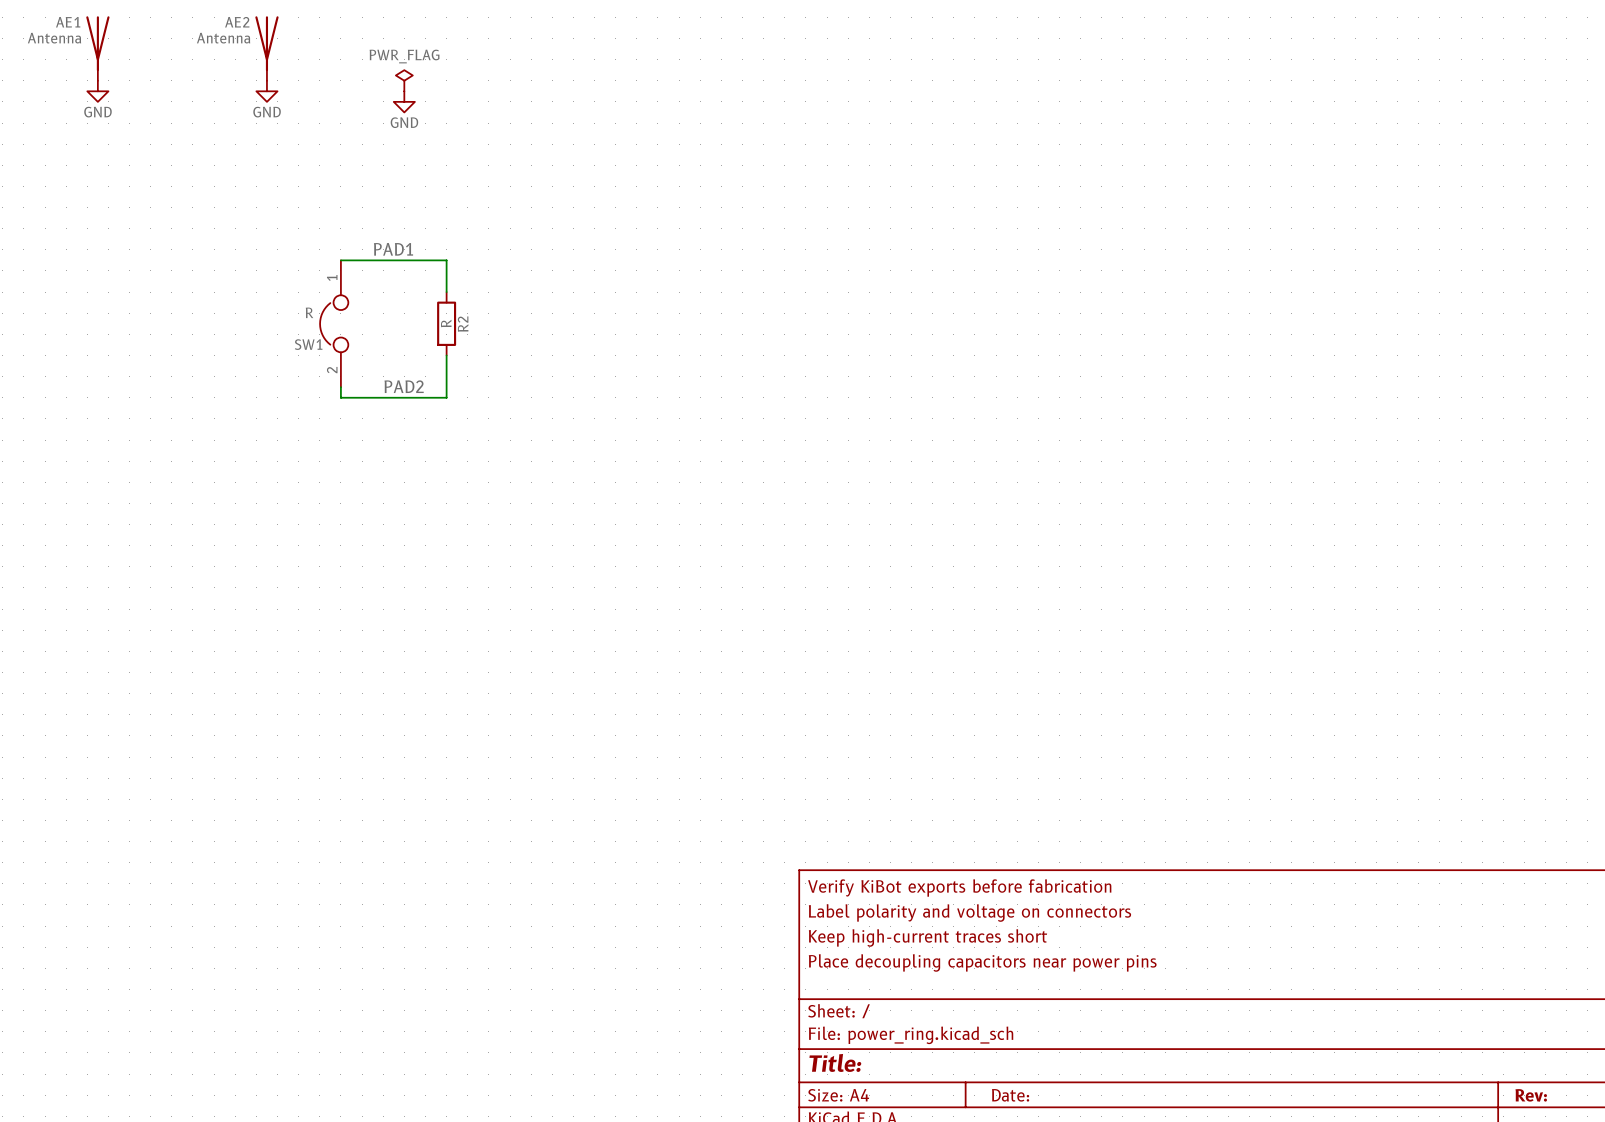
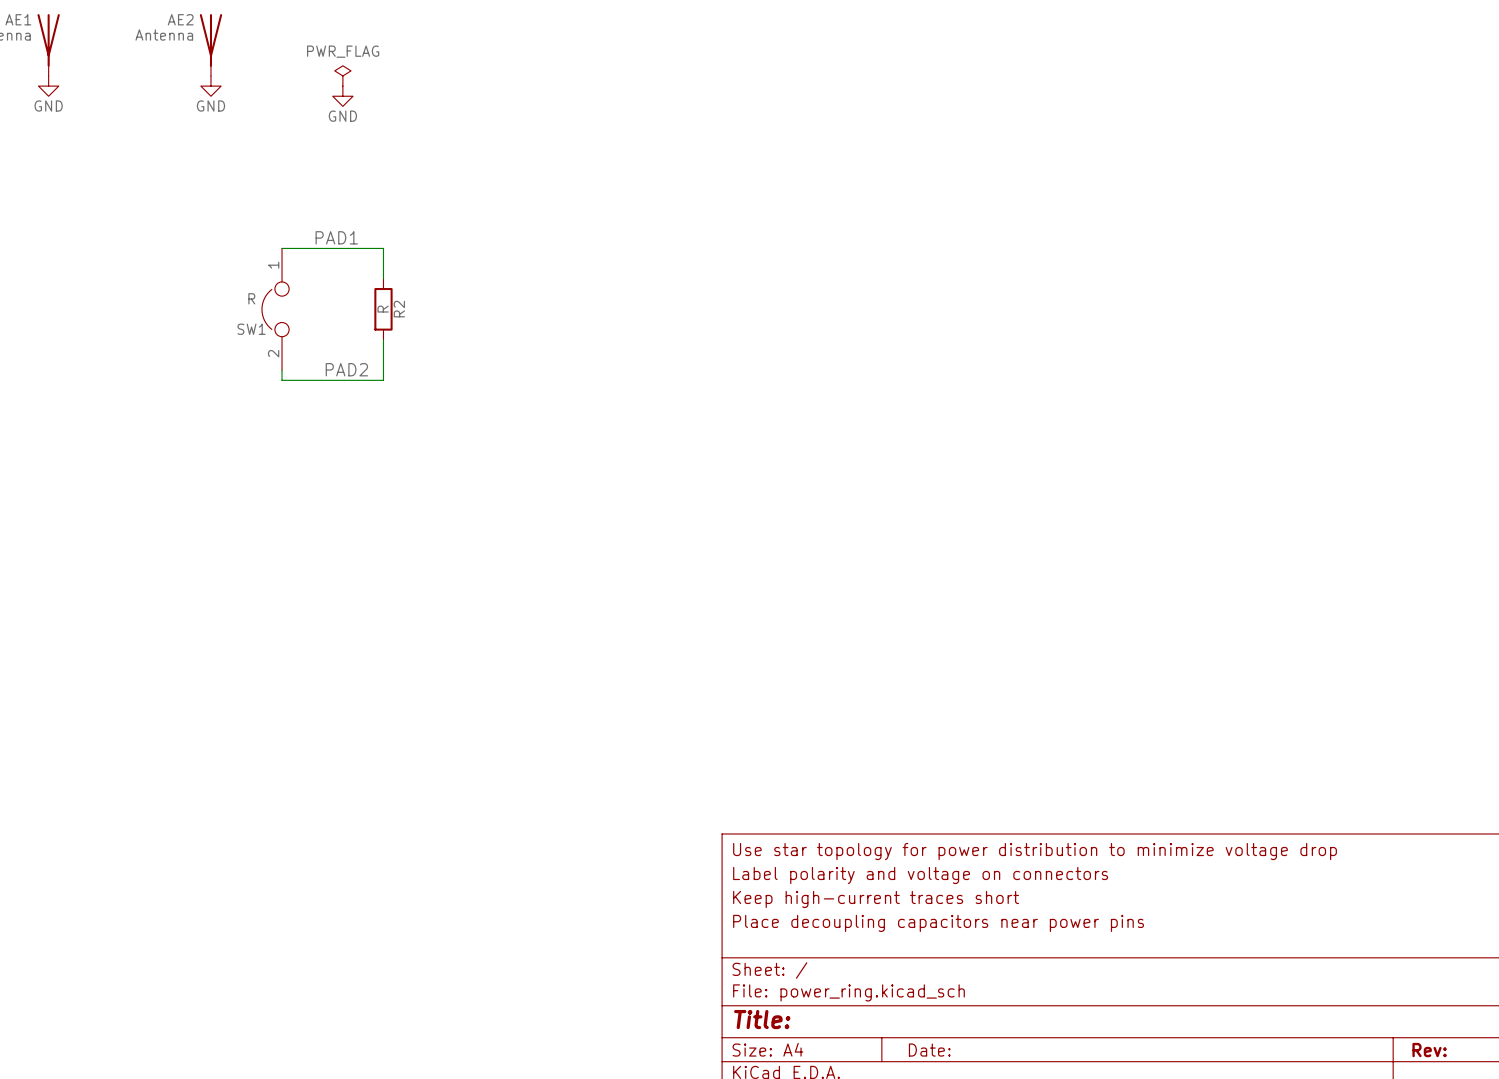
title block: Verify KiBot exports before fabrication (959, 888) -> Use star topology for power distribution to minimize voltage drop (1035, 851)

